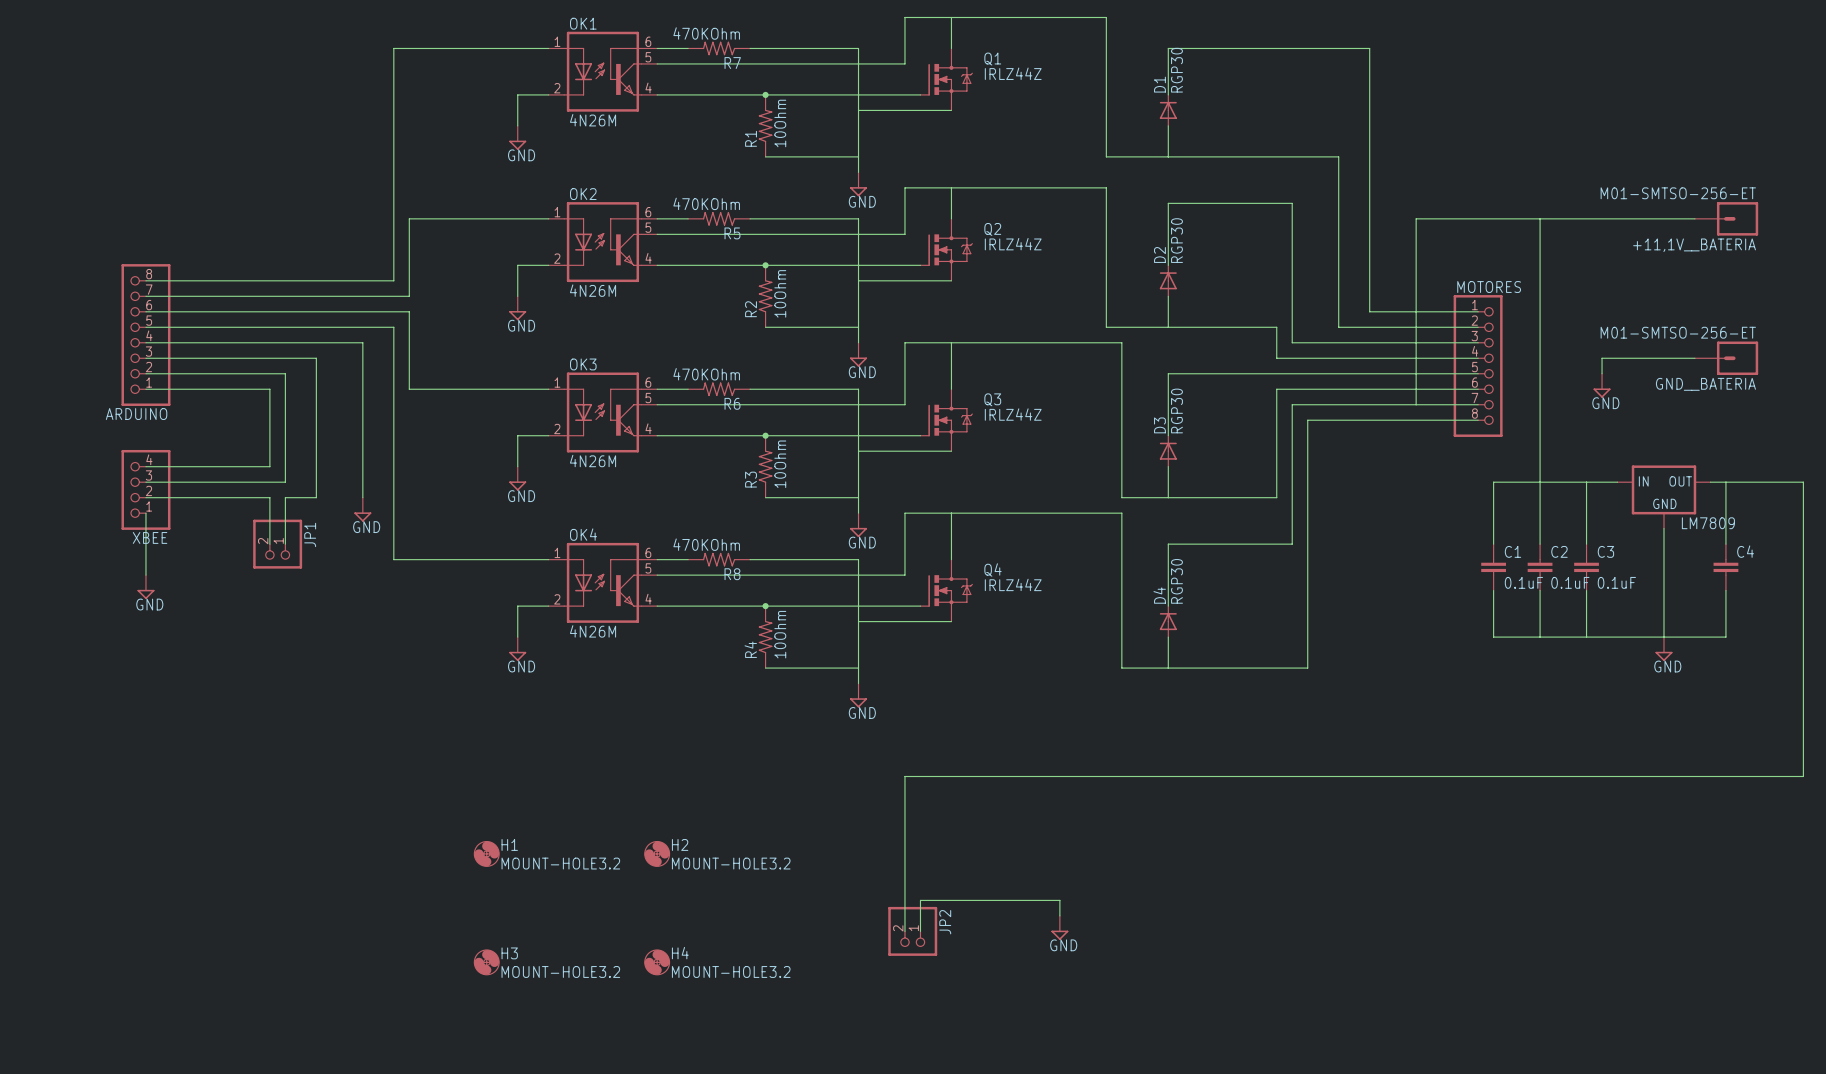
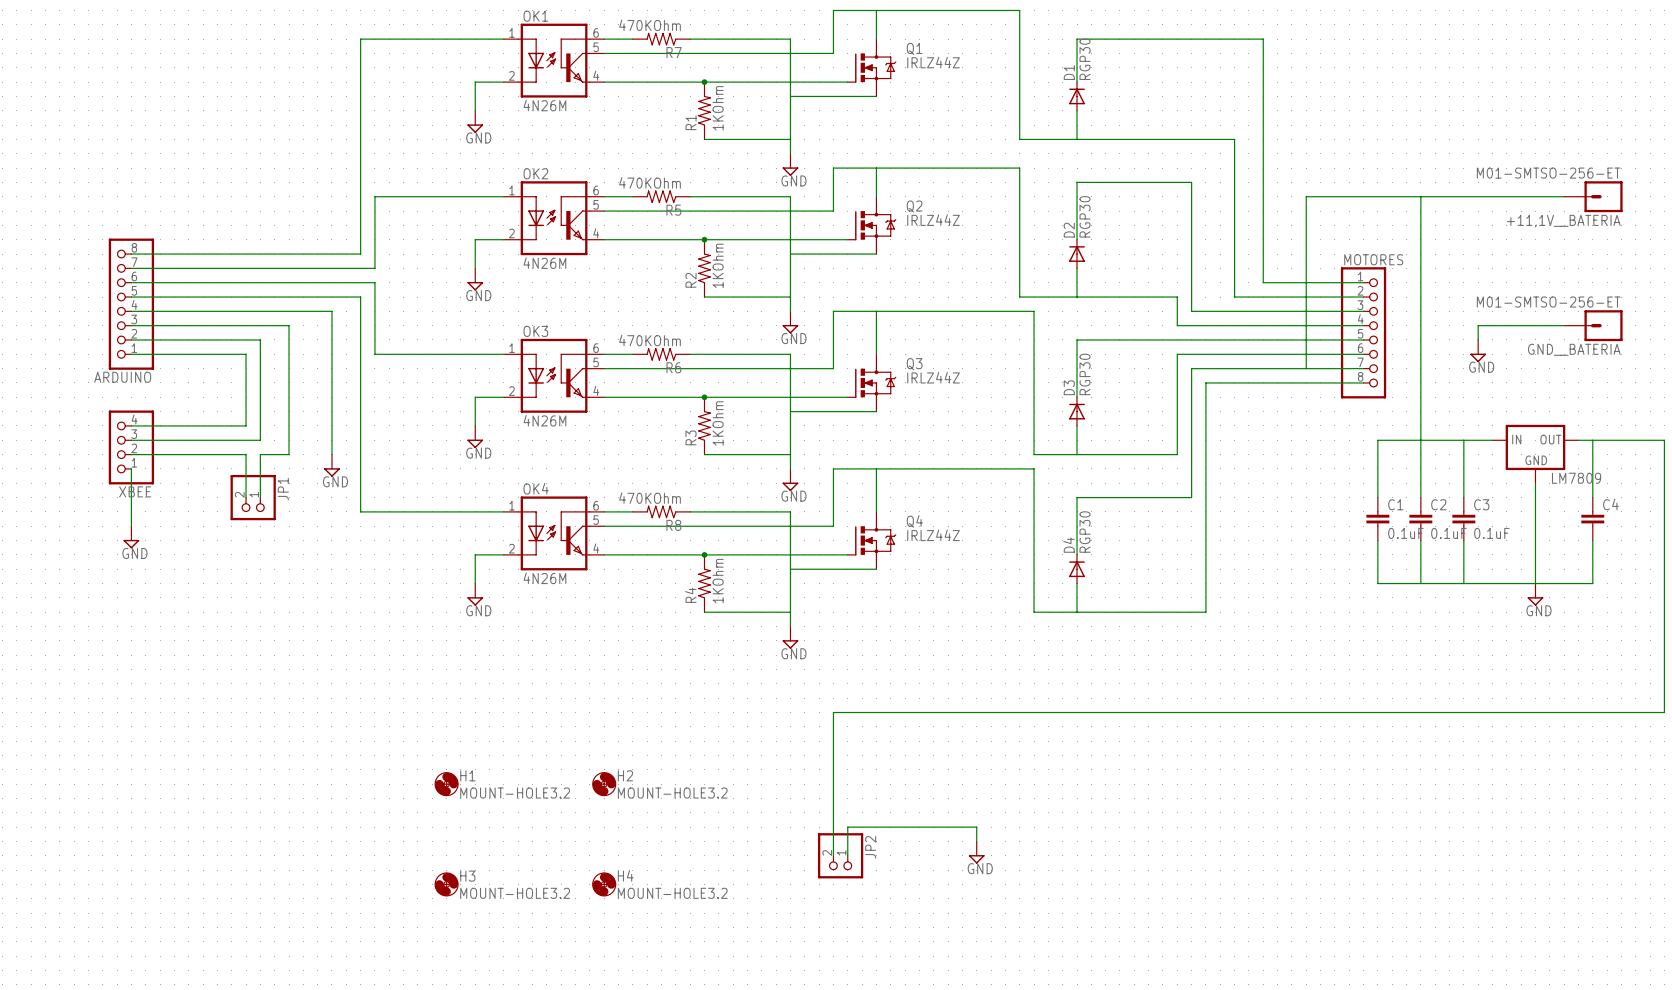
R1 value: 10Ohm (780, 123) -> 1KOhm (718, 108)
R2 value: 10Ohm (780, 293) -> 1KOhm (718, 265)
R3 value: 10Ohm (780, 464) -> 1KOhm (718, 423)
R4 value: 10Ohm (780, 634) -> 1KOhm (718, 581)

